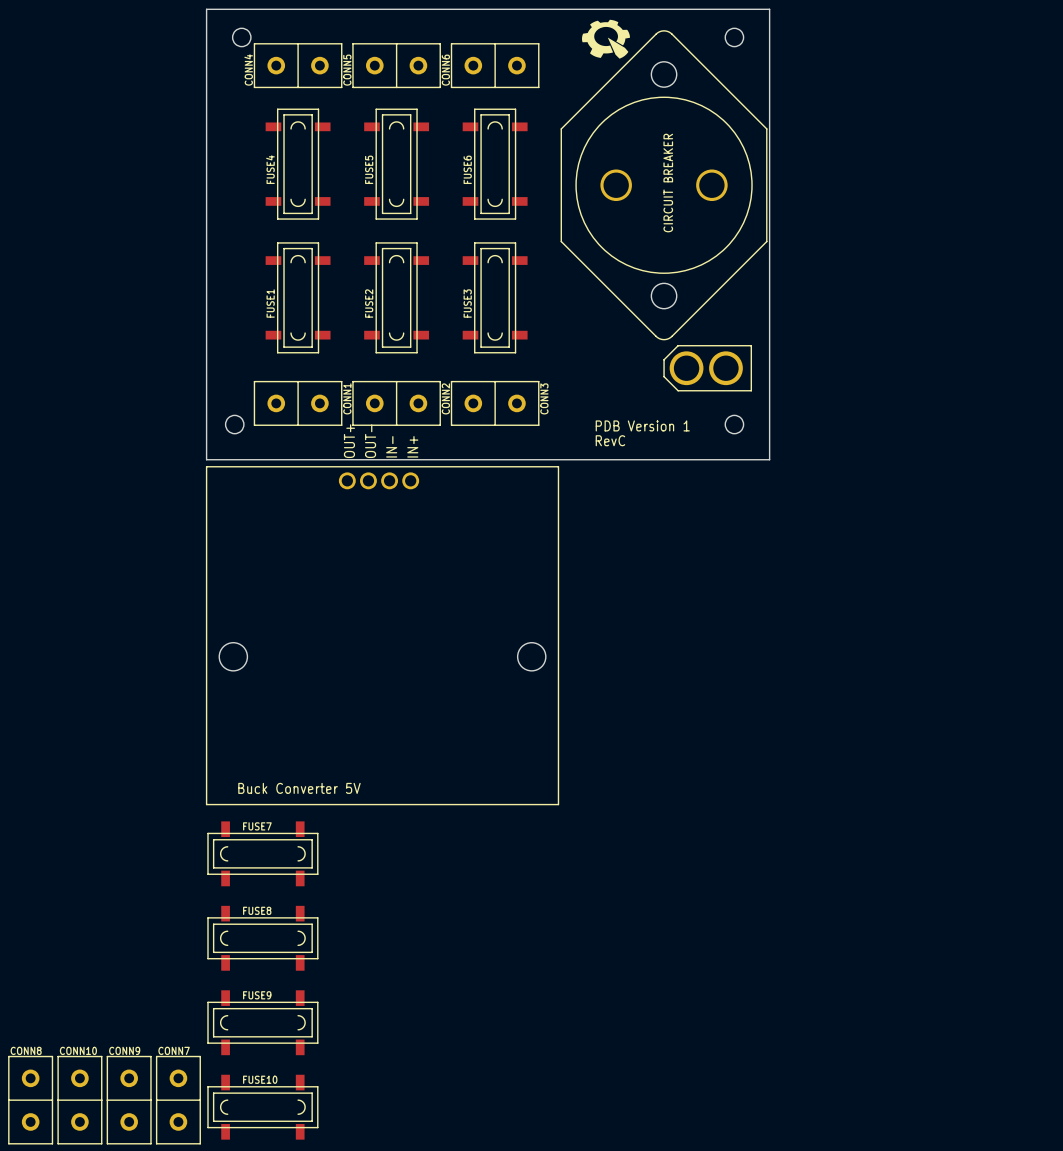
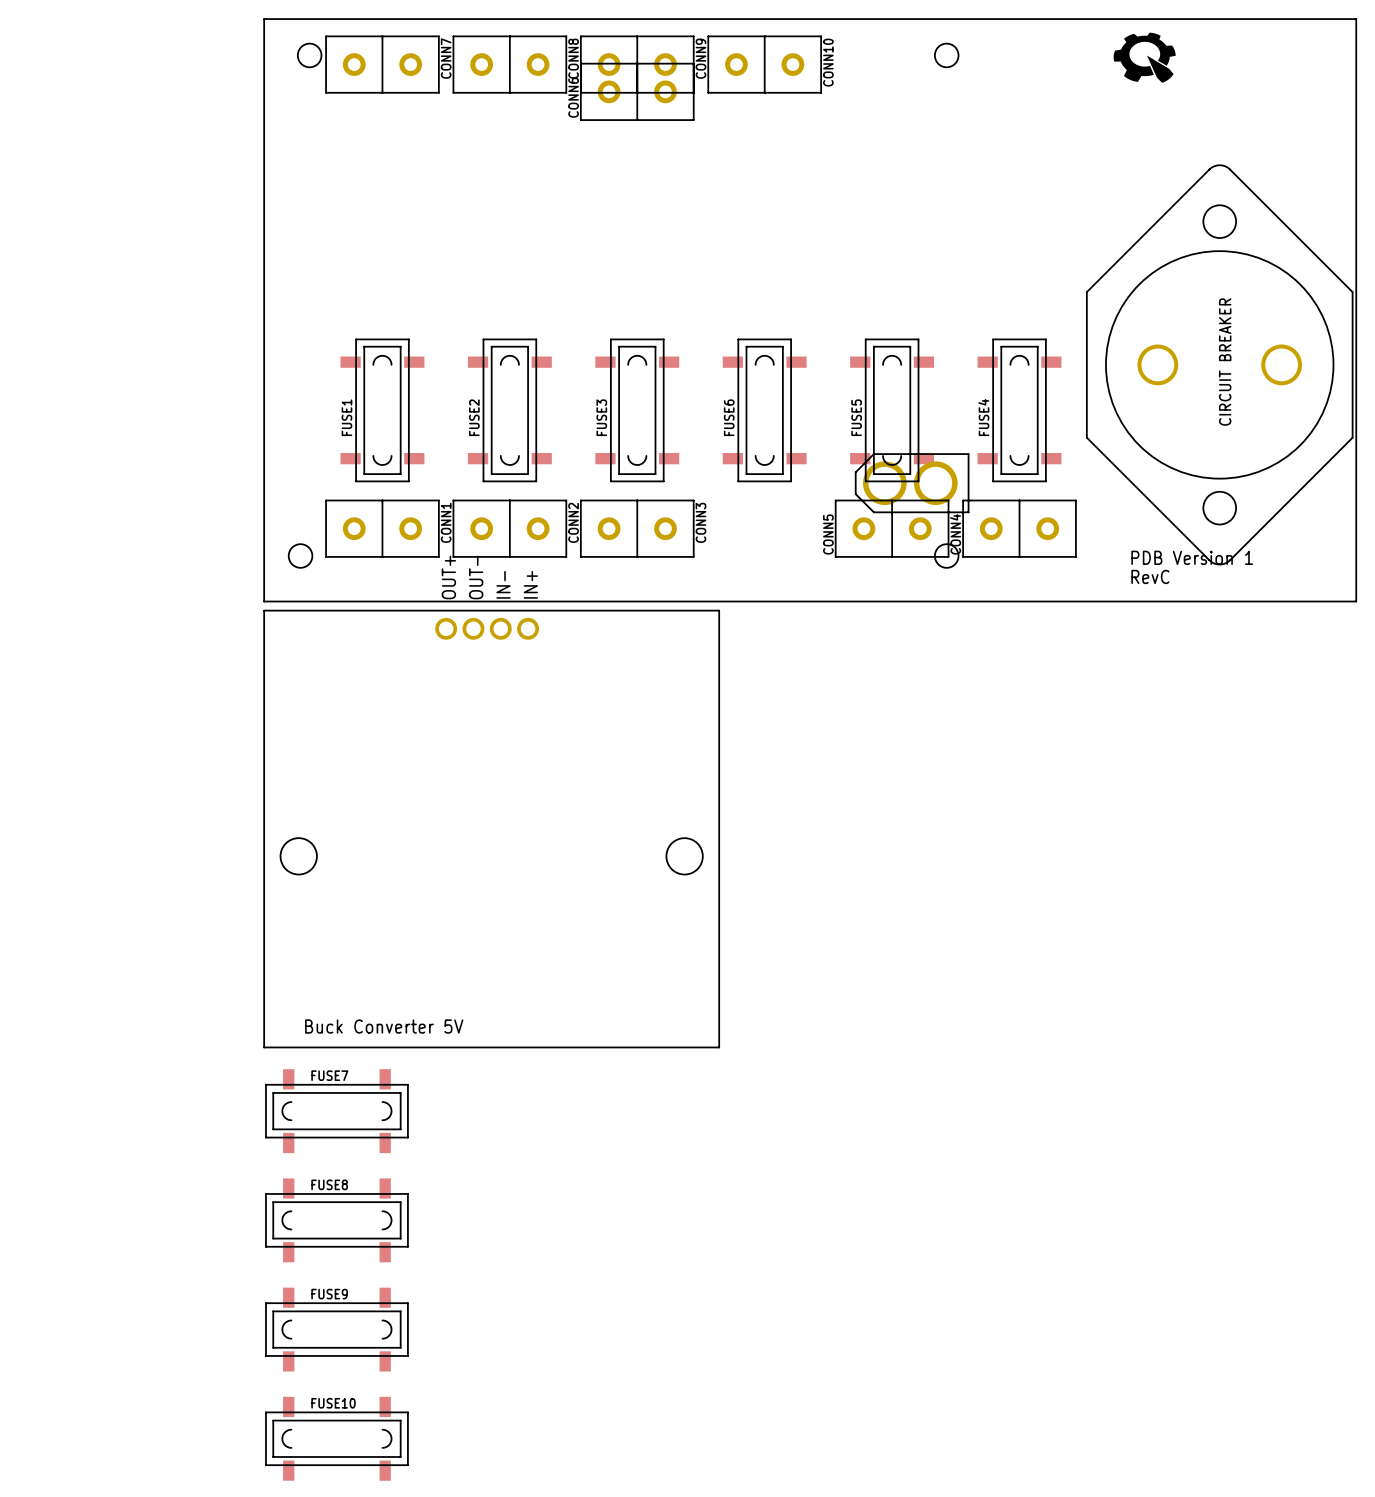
board edge: (769, 9) (769, 459) -> (992, 19) (1356, 19) (1356, 601) (992, 601)
drawing: [582, 19, 630, 59] -> none
drawing: none -> [1113, 32, 1176, 83]
CONN4 position: (298, 65) -> (1019, 528)
CONN5 position: (396, 65) -> (892, 528)
FUSE4 position: (298, 164) -> (1019, 410)
FUSE5 position: (396, 164) -> (892, 410)
FUSE6 position: (495, 164) -> (764, 410)
part: (664, 185) -> none
part: none -> (1219, 364)
FUSE1 position: (298, 297) -> (382, 410)
FUSE2 position: (396, 297) -> (509, 410)
FUSE3 position: (495, 297) -> (637, 410)
text: PDB Version 1 (642, 425) -> none
text: none -> PDB Version 1 (1192, 557)
text: RevC (610, 440) -> none
text: none -> RevC (1150, 576)
CONN8 rotation: 0° (30, 1100) -> 90° clockwise (509, 64)
CONN8 position: (30, 1100) -> (509, 64)
CONN10 rotation: 0° (79, 1100) -> 90° clockwise (764, 64)
CONN10 position: (79, 1100) -> (764, 64)
CONN9 rotation: 0° (129, 1100) -> 90° clockwise (637, 64)
CONN9 position: (129, 1100) -> (637, 64)
CONN7 rotation: 0° (178, 1100) -> 90° clockwise (382, 64)
CONN7 position: (178, 1100) -> (382, 64)

